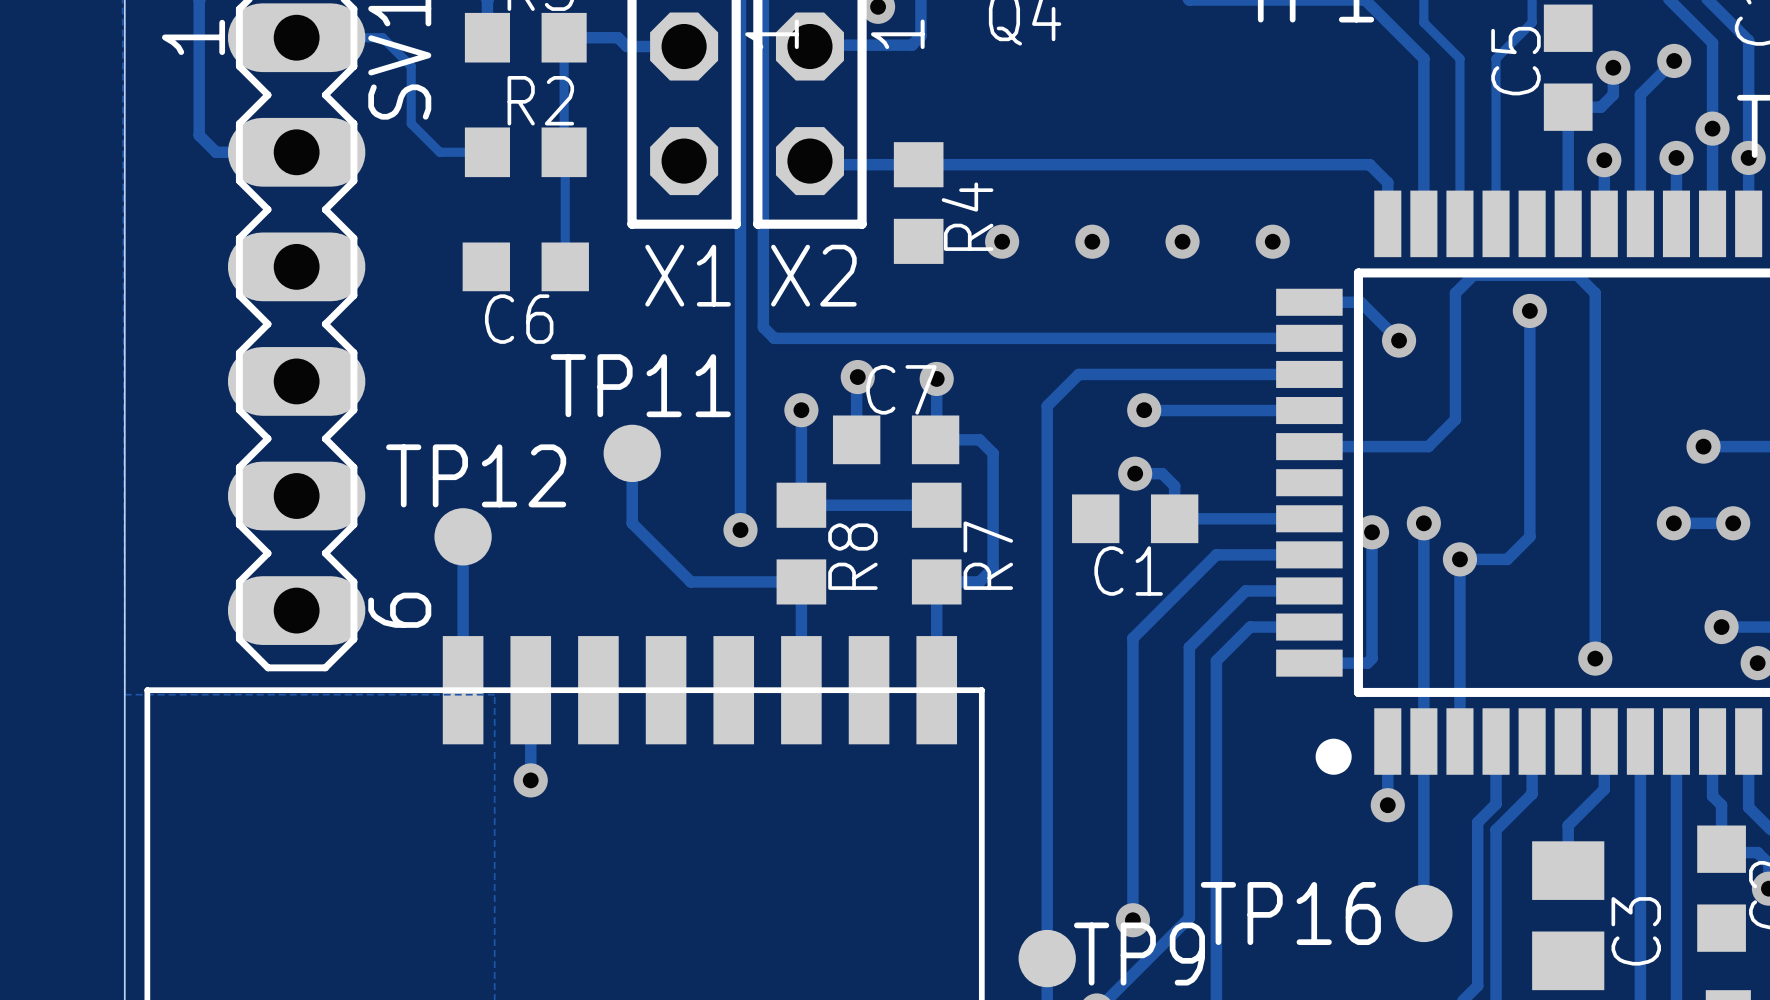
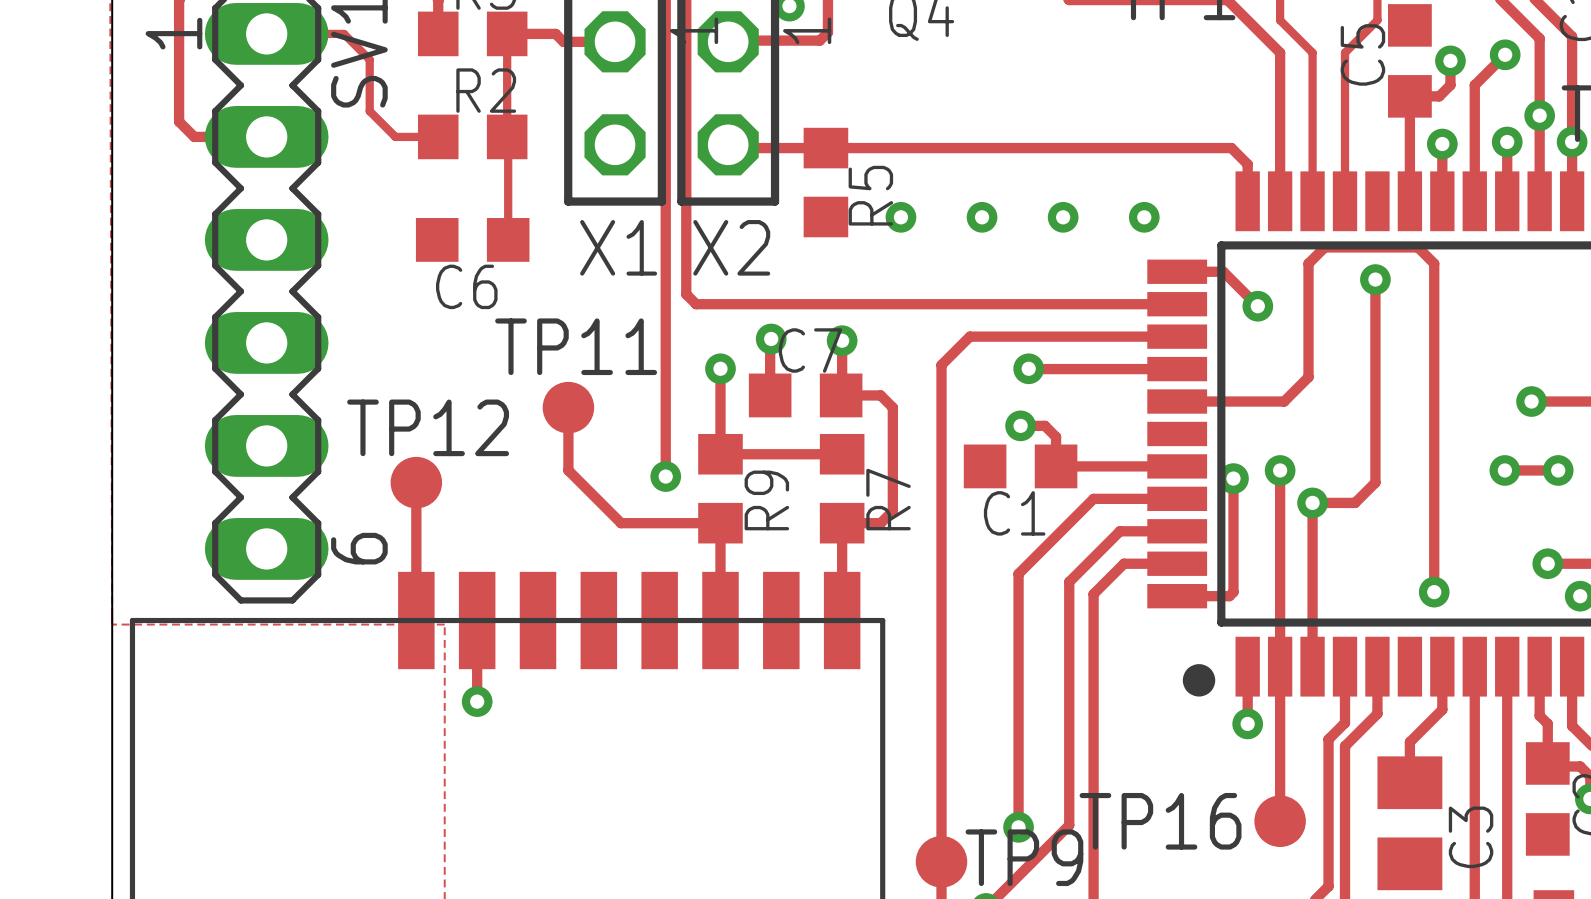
R4 name: R4 (967, 216) -> R5 (870, 195)
R8 name: R8 (852, 556) -> R9 (766, 500)

